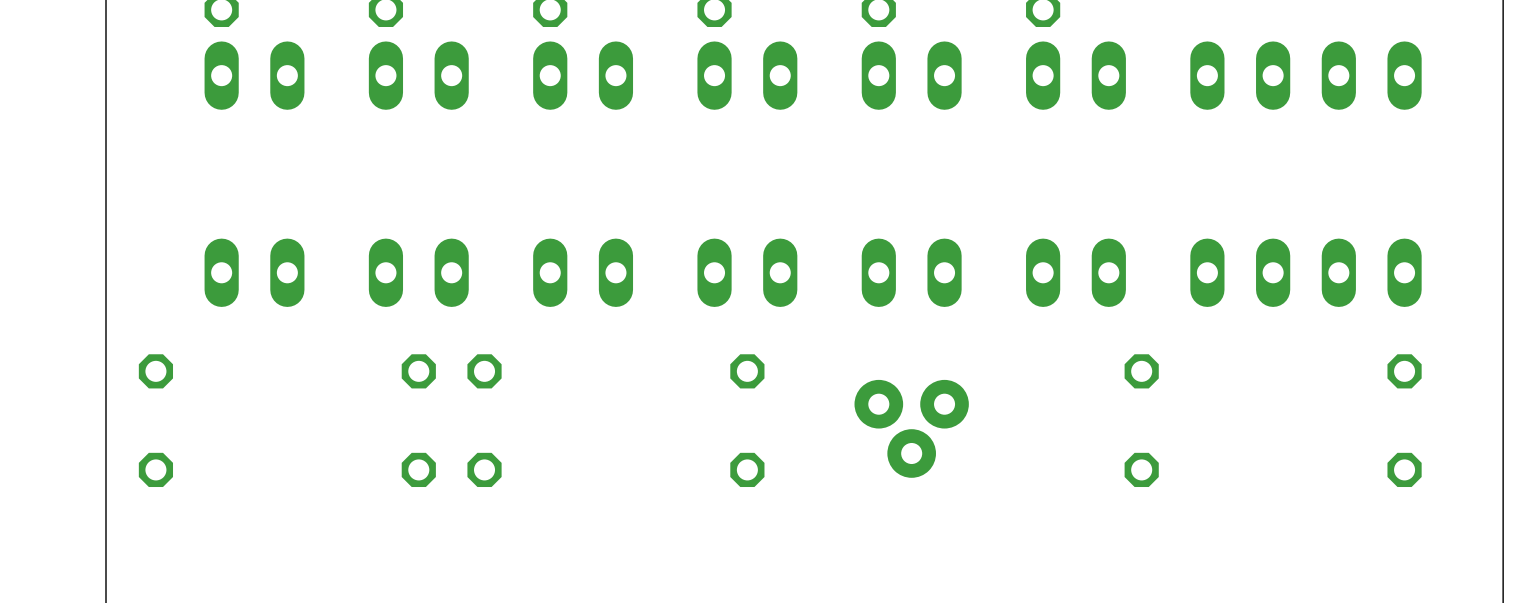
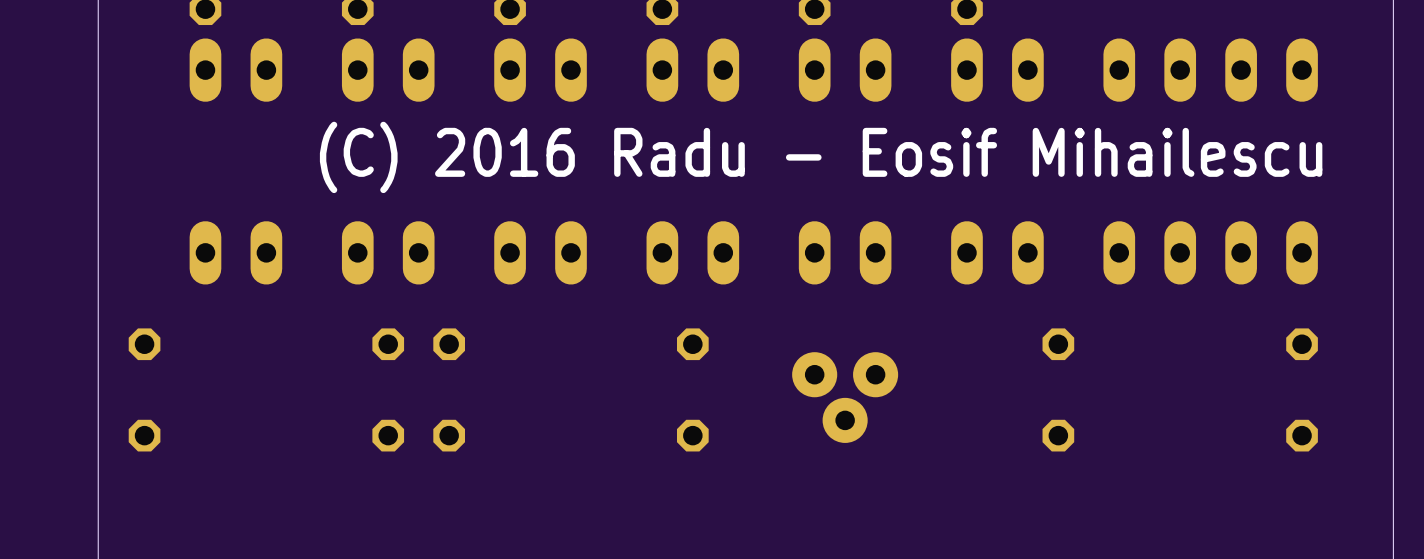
text: none -> (C) 2016 Radu - Eosif Mihailescu (821, 157)

